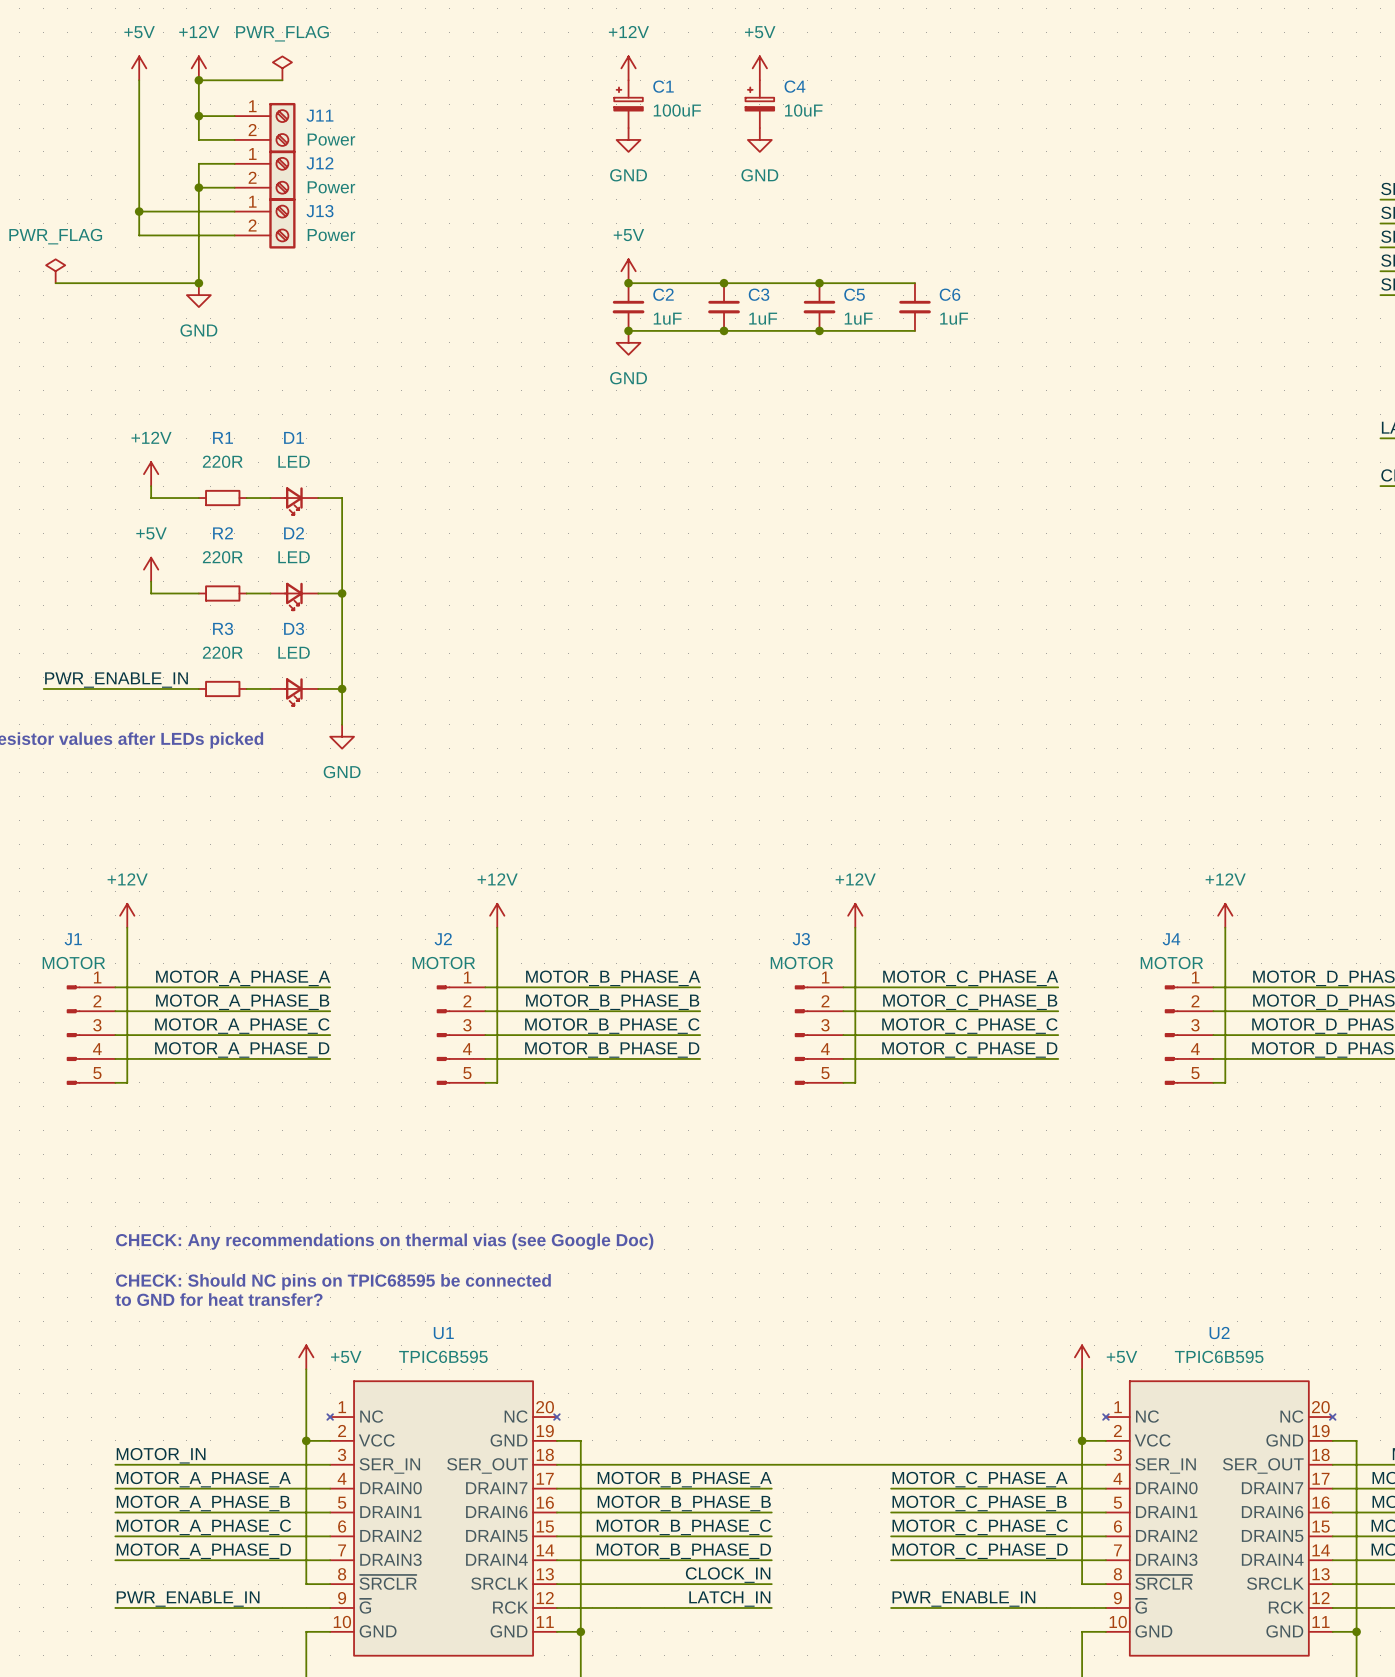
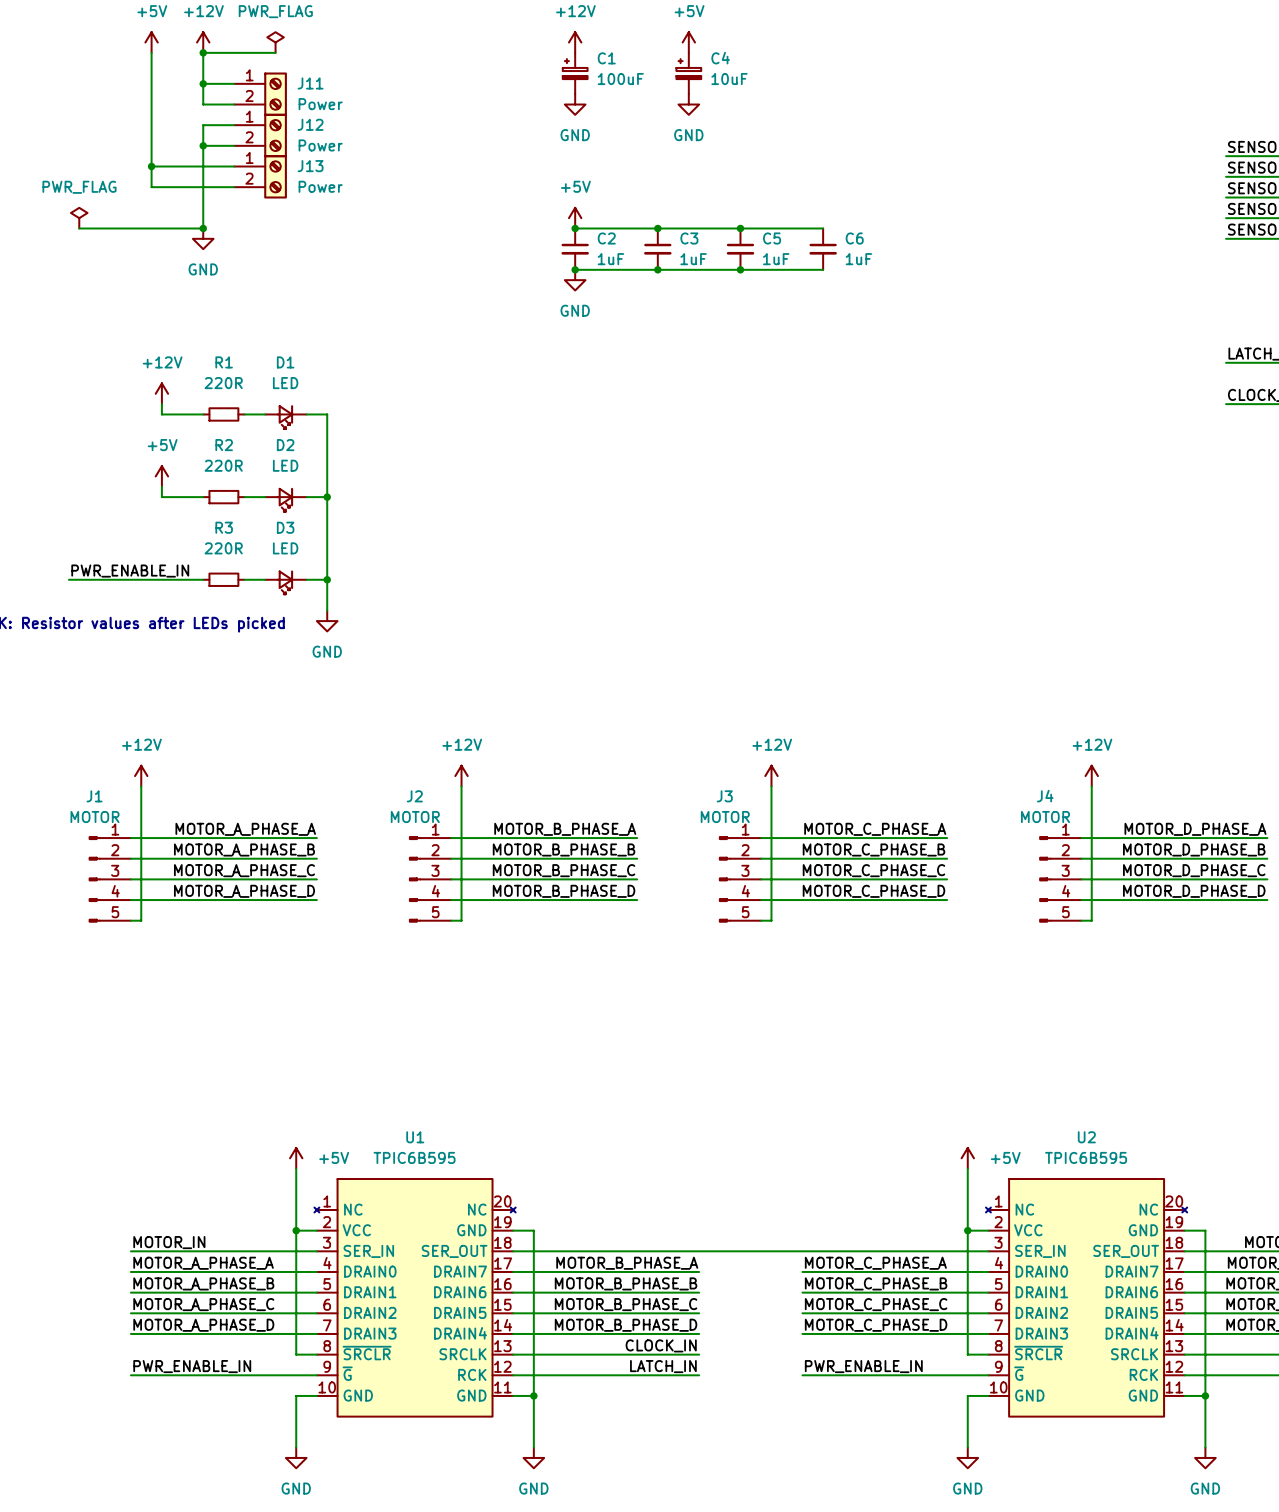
text: CHECK: Any recommendations on thermal vias (see Google Doc) (384, 1241) -> none
text: CHECK: Should NC pins on TPIC68595 be connected (333, 1282) -> none
text: to GND for heat transfer? (219, 1299) -> none

